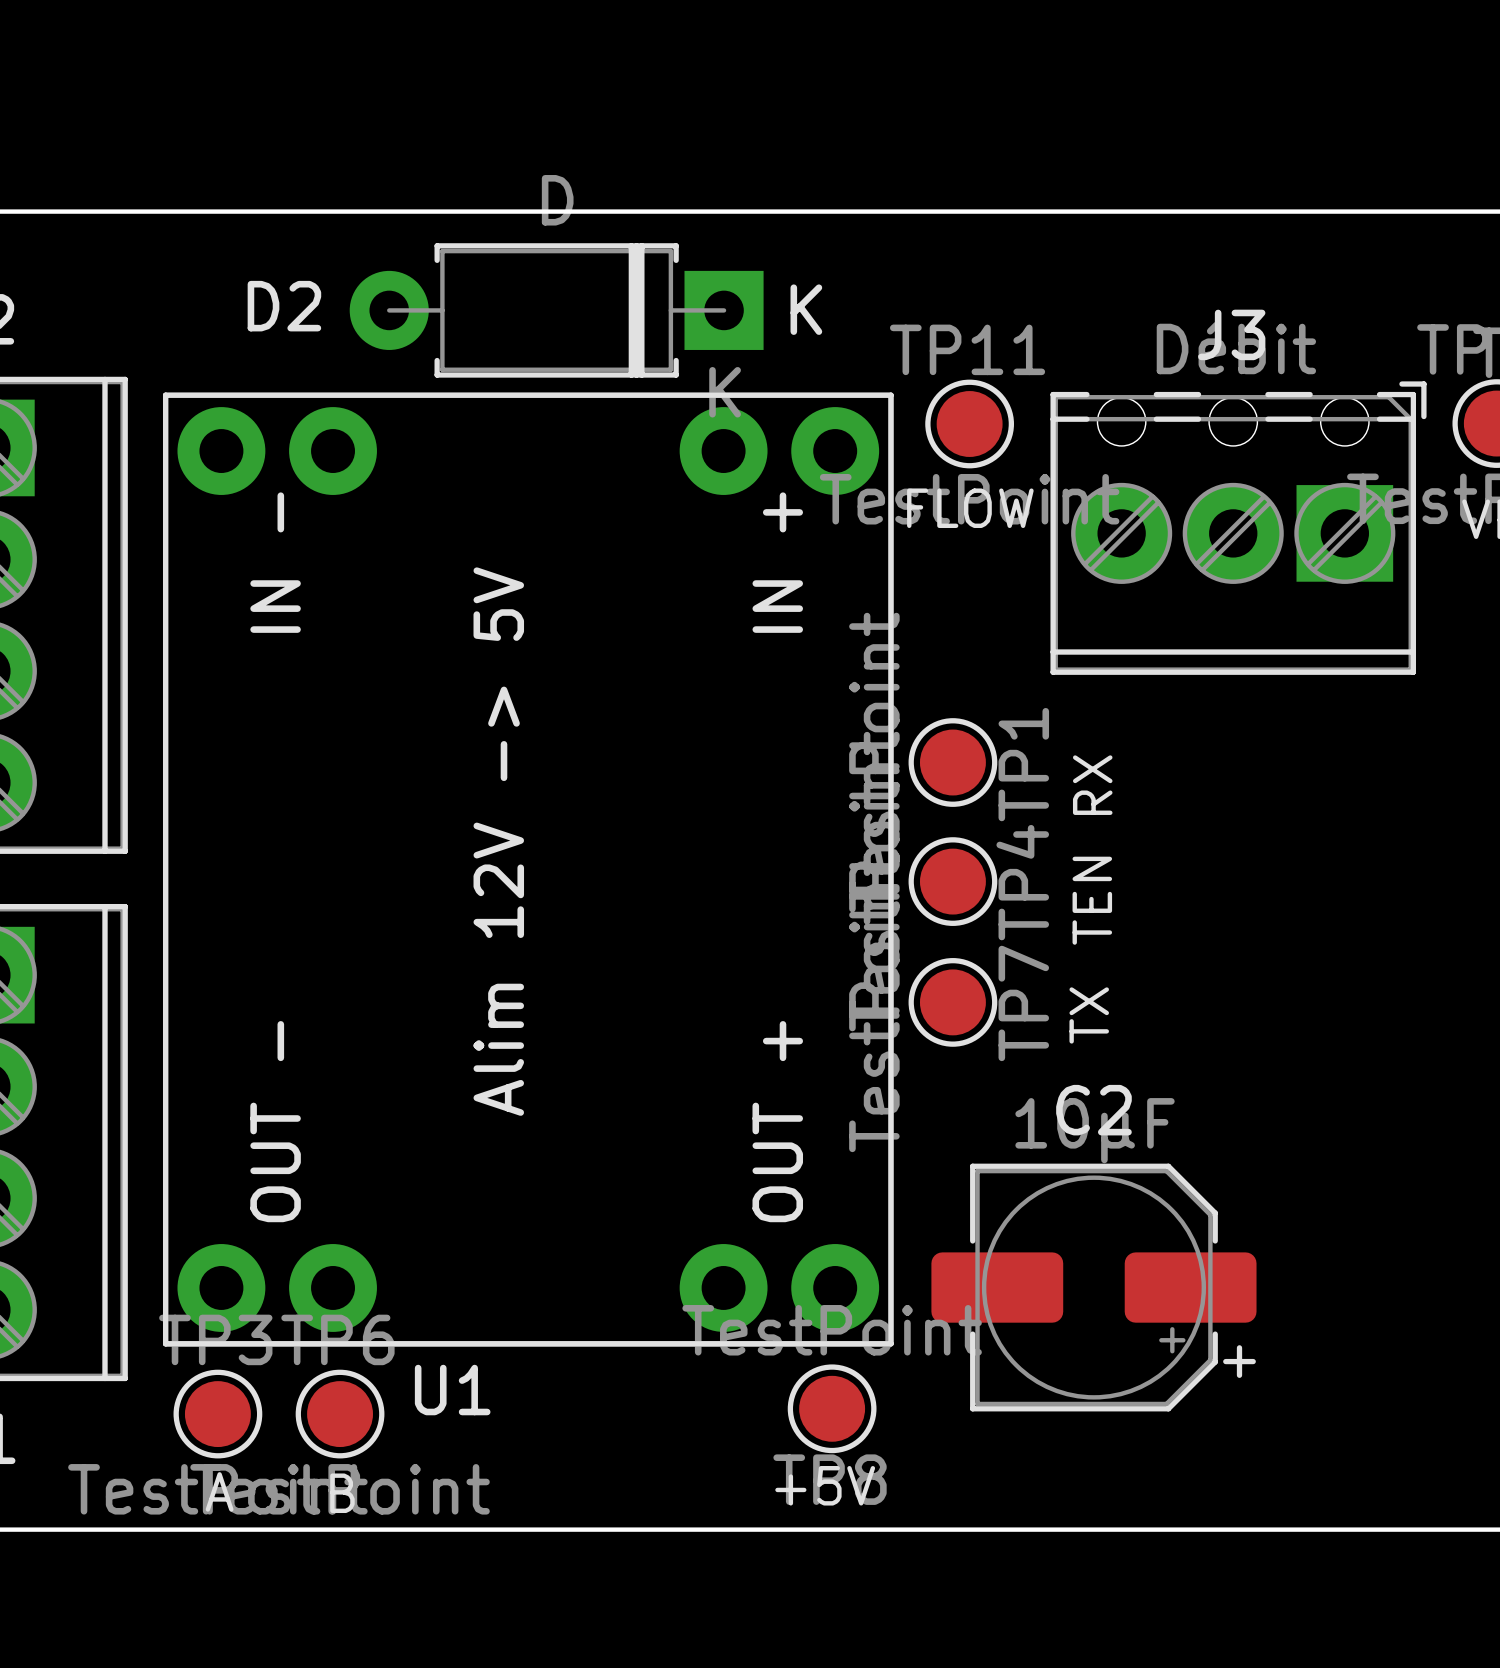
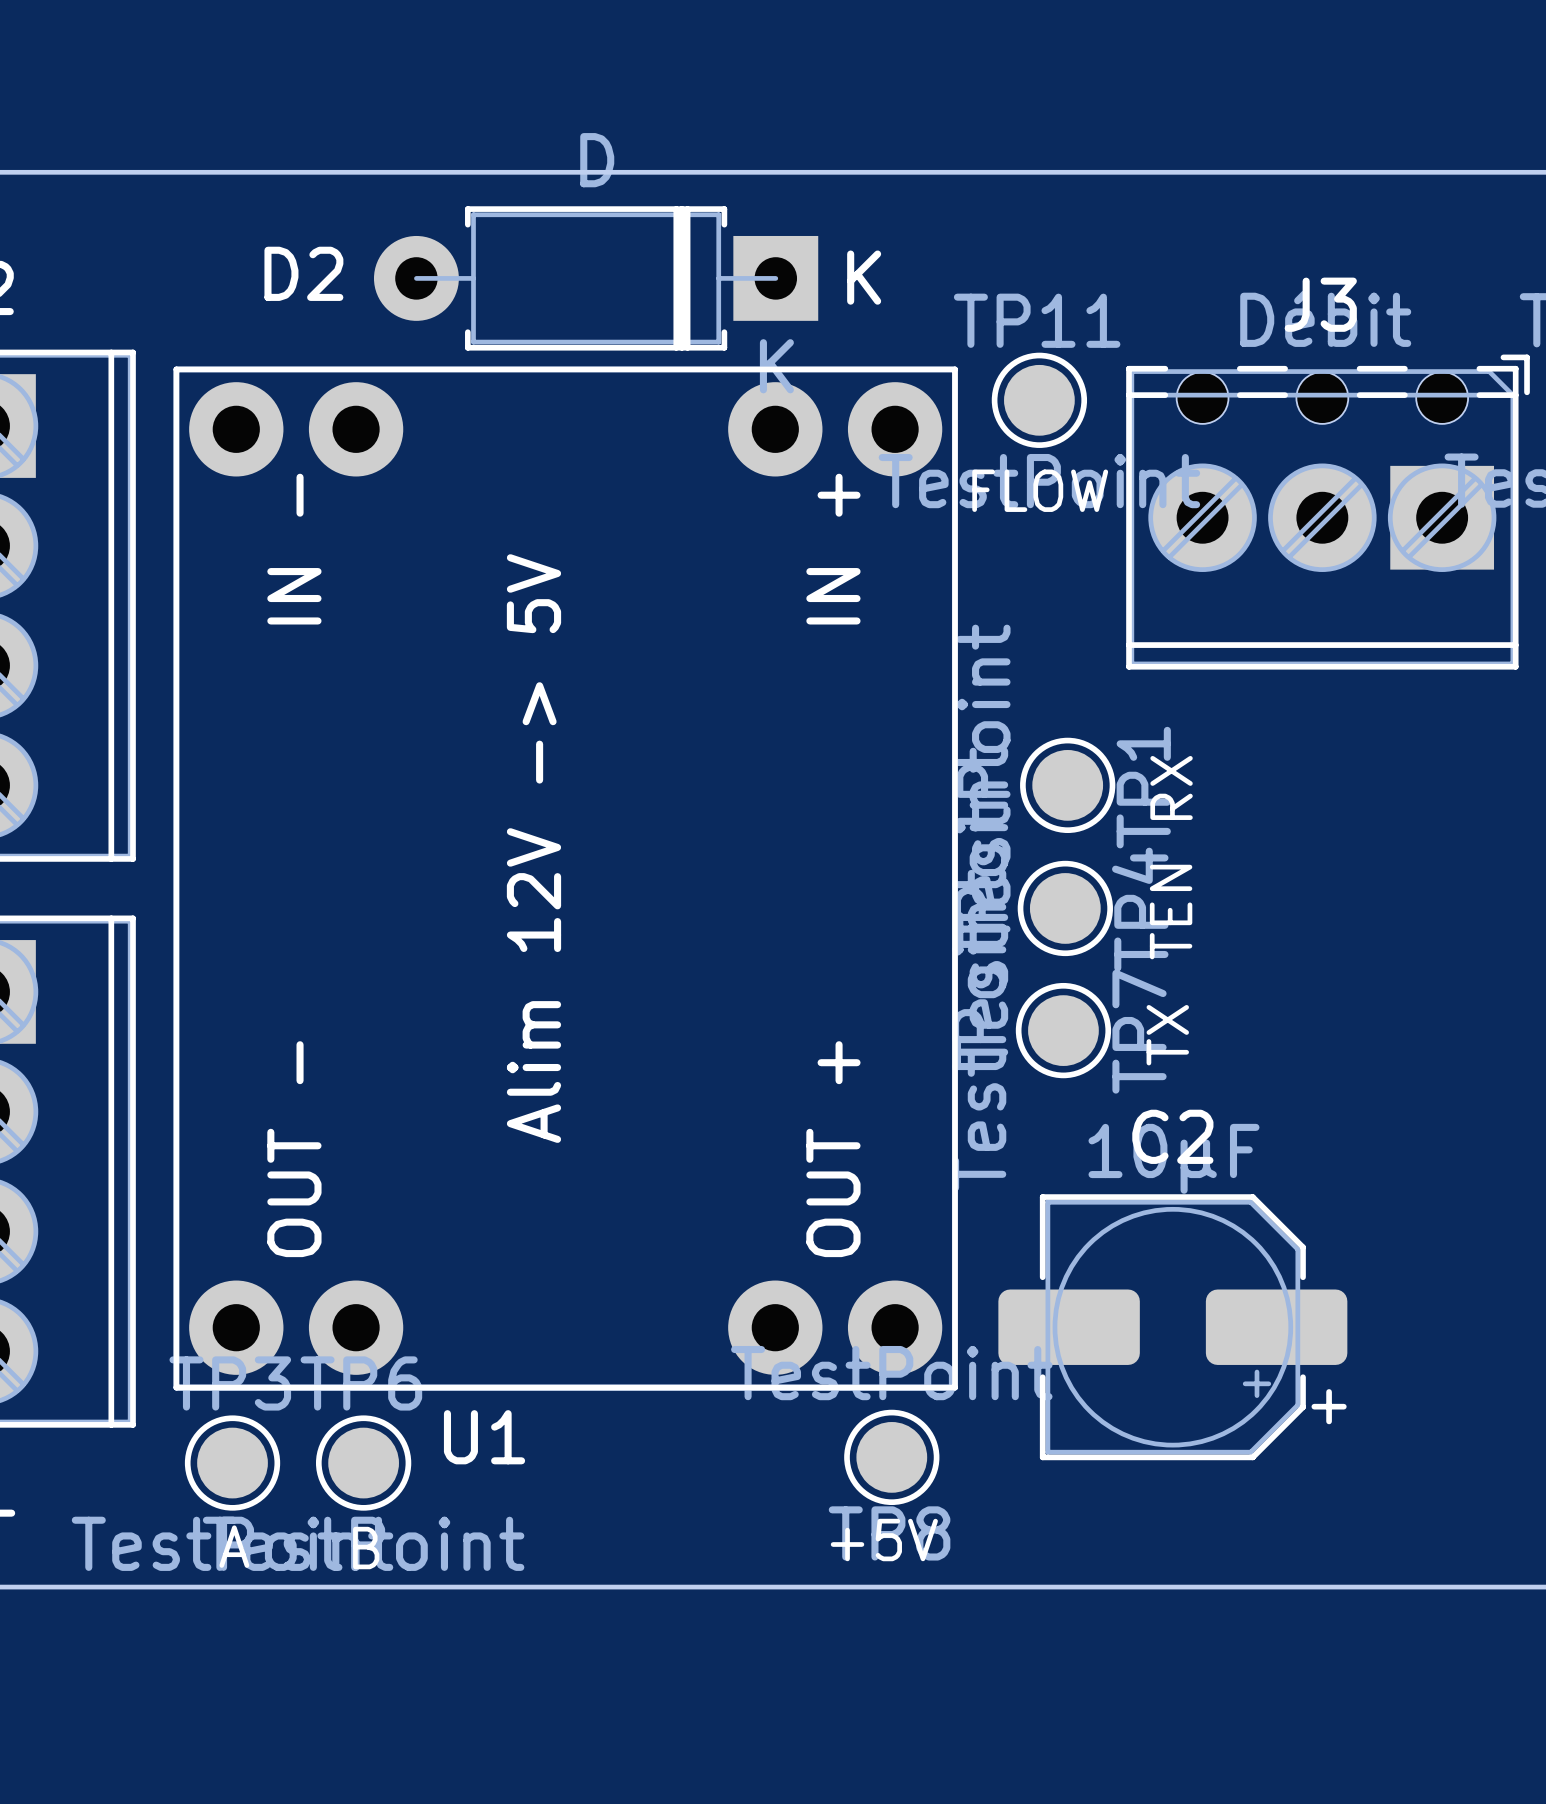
TP1 position: (952, 762) -> (1067, 785)
TP4 position: (952, 881) -> (1065, 908)
TP7 position: (952, 1002) -> (1063, 1030)

